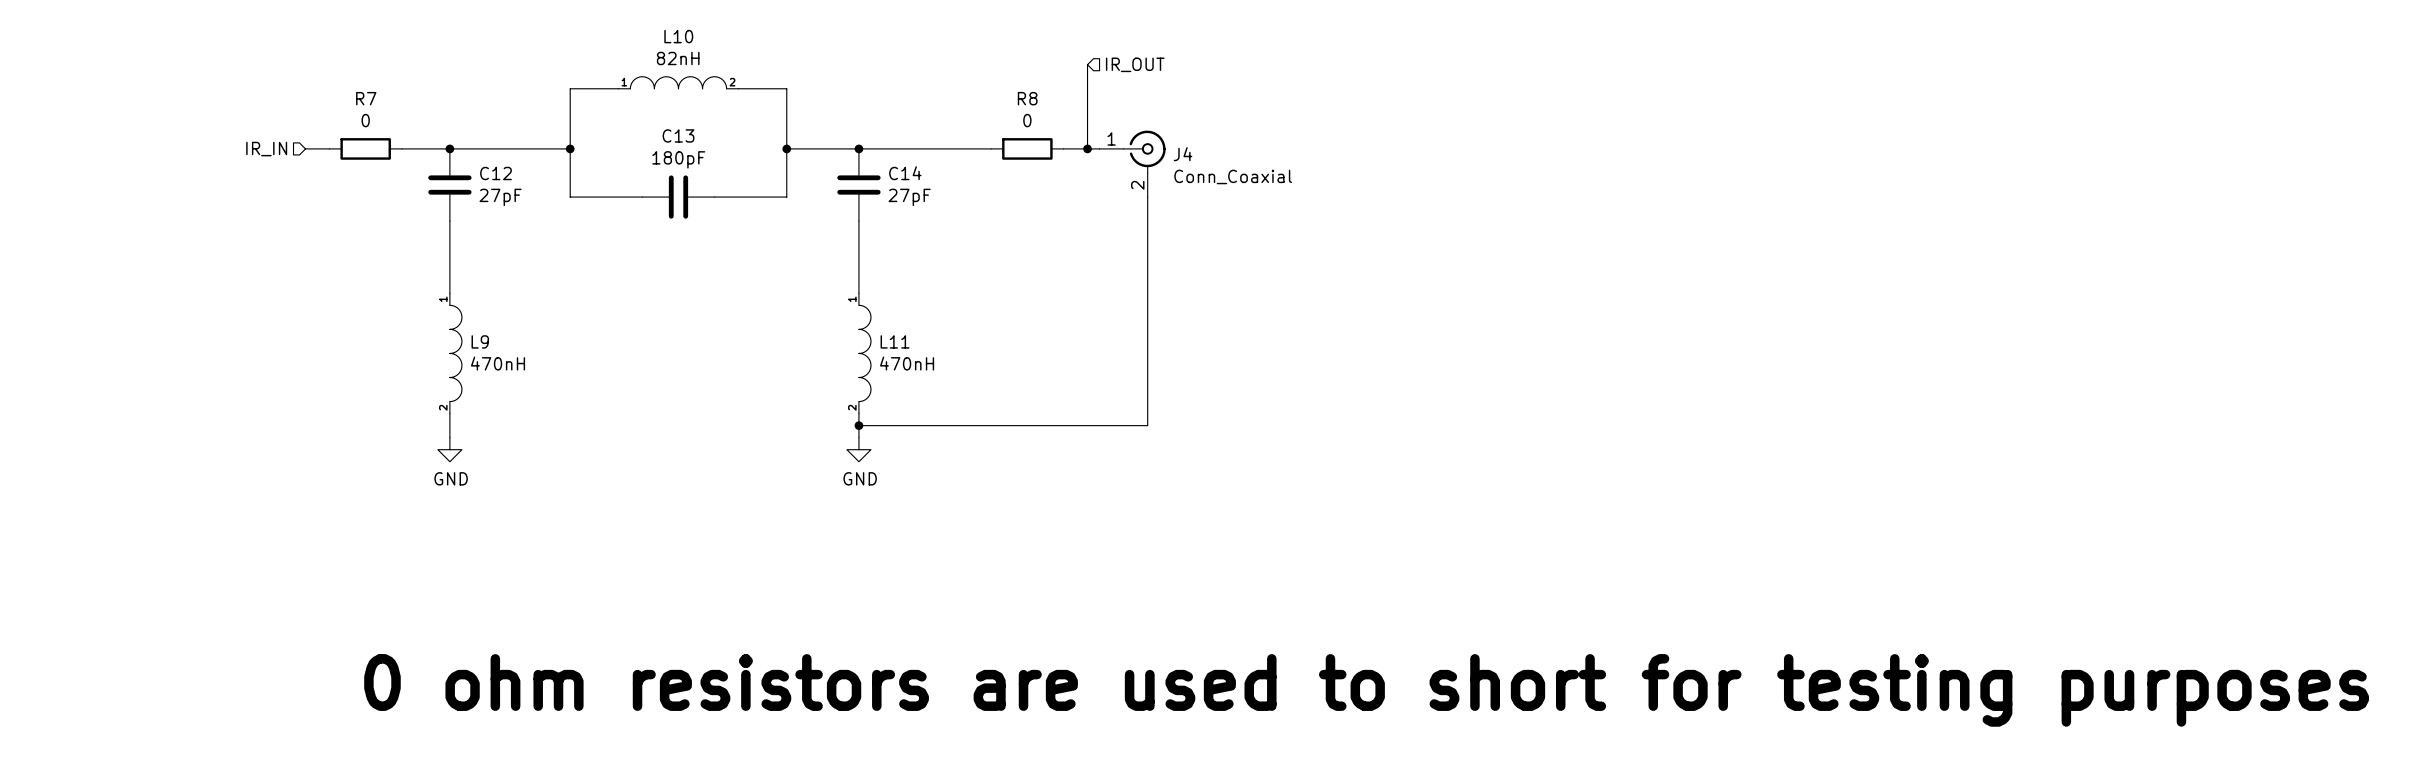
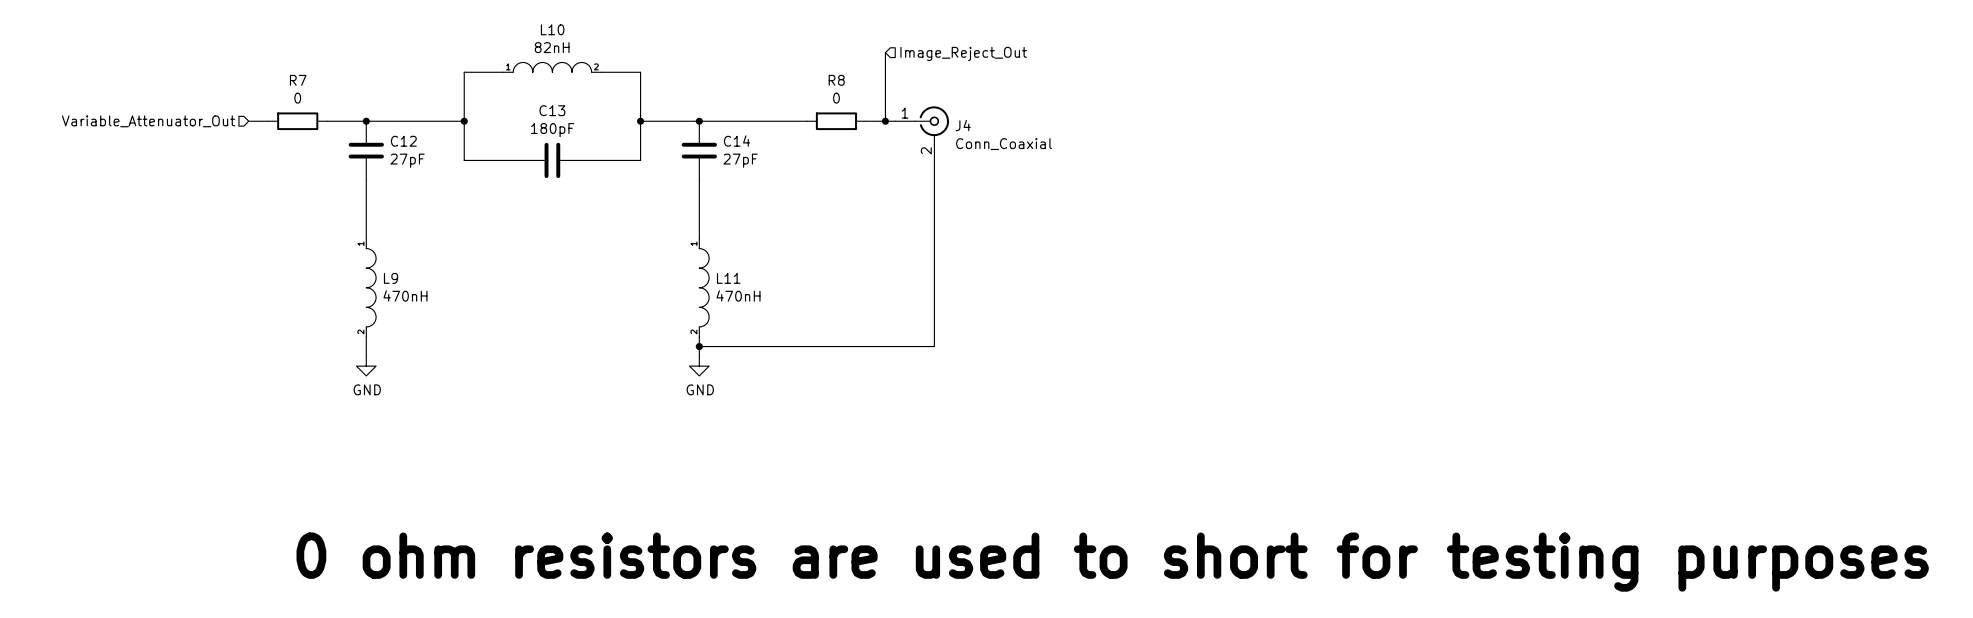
hierarchical label: IR_OUT (1135, 64) -> Image_Reject_Out (963, 53)
hierarchical label: IR_IN (266, 149) -> Variable_Attenuator_Out (148, 121)

